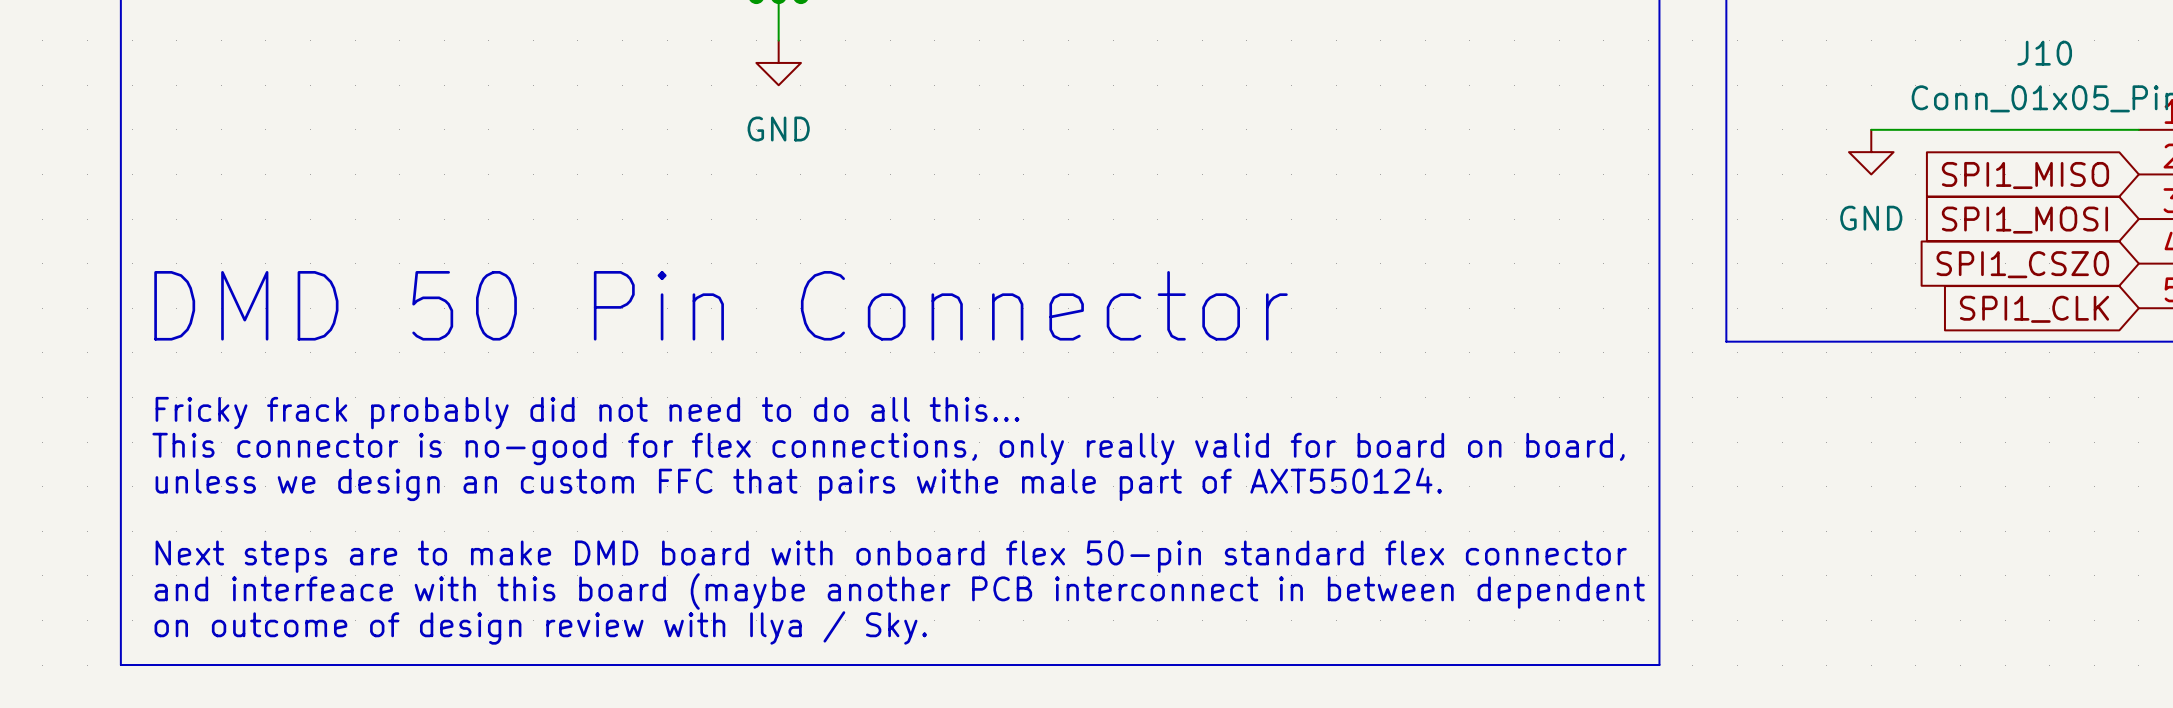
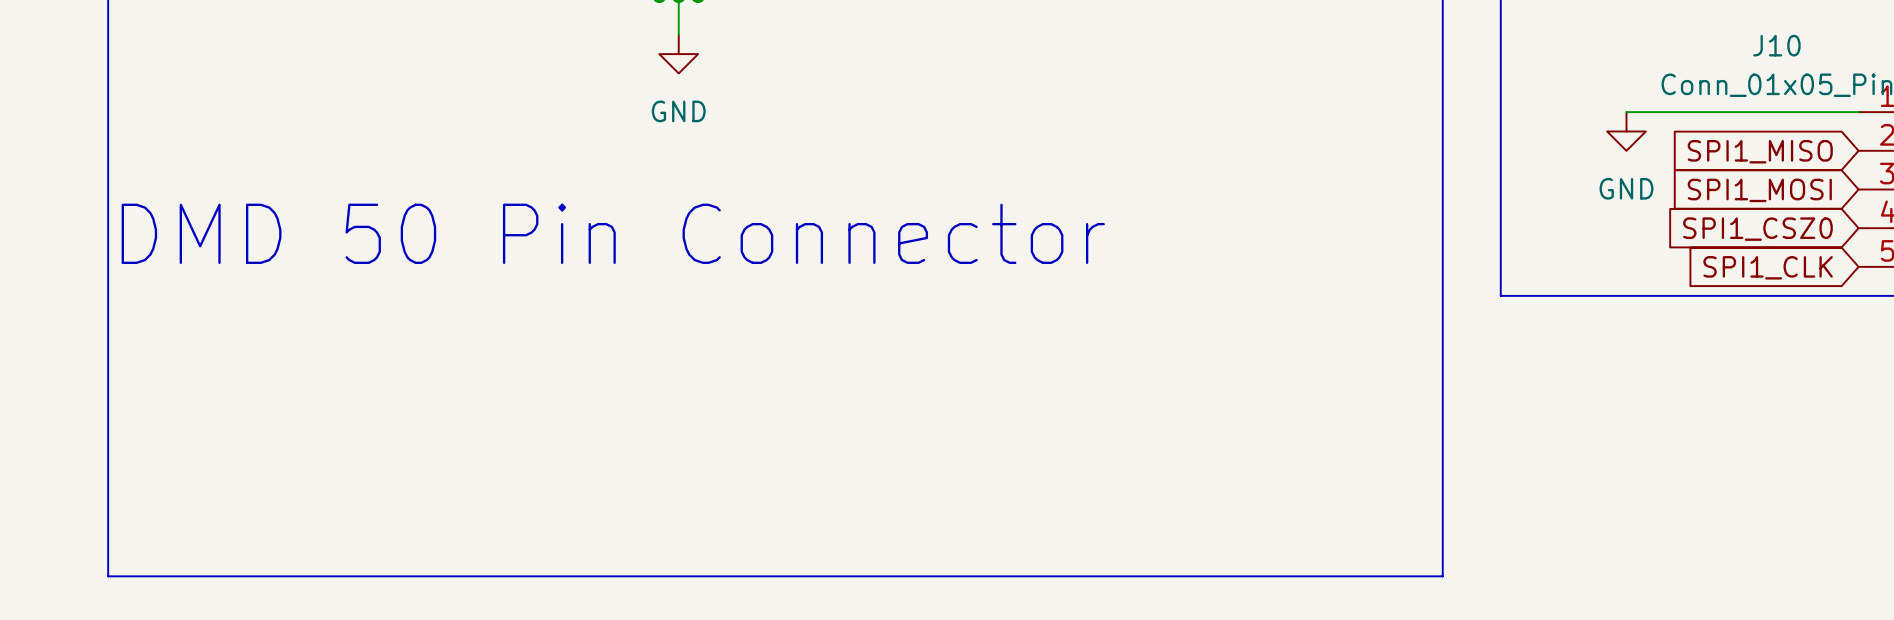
text position: DMD 50 Pin Connector (721, 305) -> DMD 50 Pin Connector (613, 233)
text: Fricky frack probably did not need to do all this... (587, 413) -> none
text: This connector is no-good for flex connections, only really valid for board on board, (888, 448) -> none
text: unless we design an custom FFC that pairs withe male part of AXT550124. (798, 484) -> none
text: Next steps are to make DMD board with onboard flex 50-pin standard flex connector (891, 556) -> none
text: and interfeace with this board (maybe another PCB interconnect in between dependent (899, 591) -> none
text: on outcome of design review with Ilya / Sky. (540, 627) -> none

